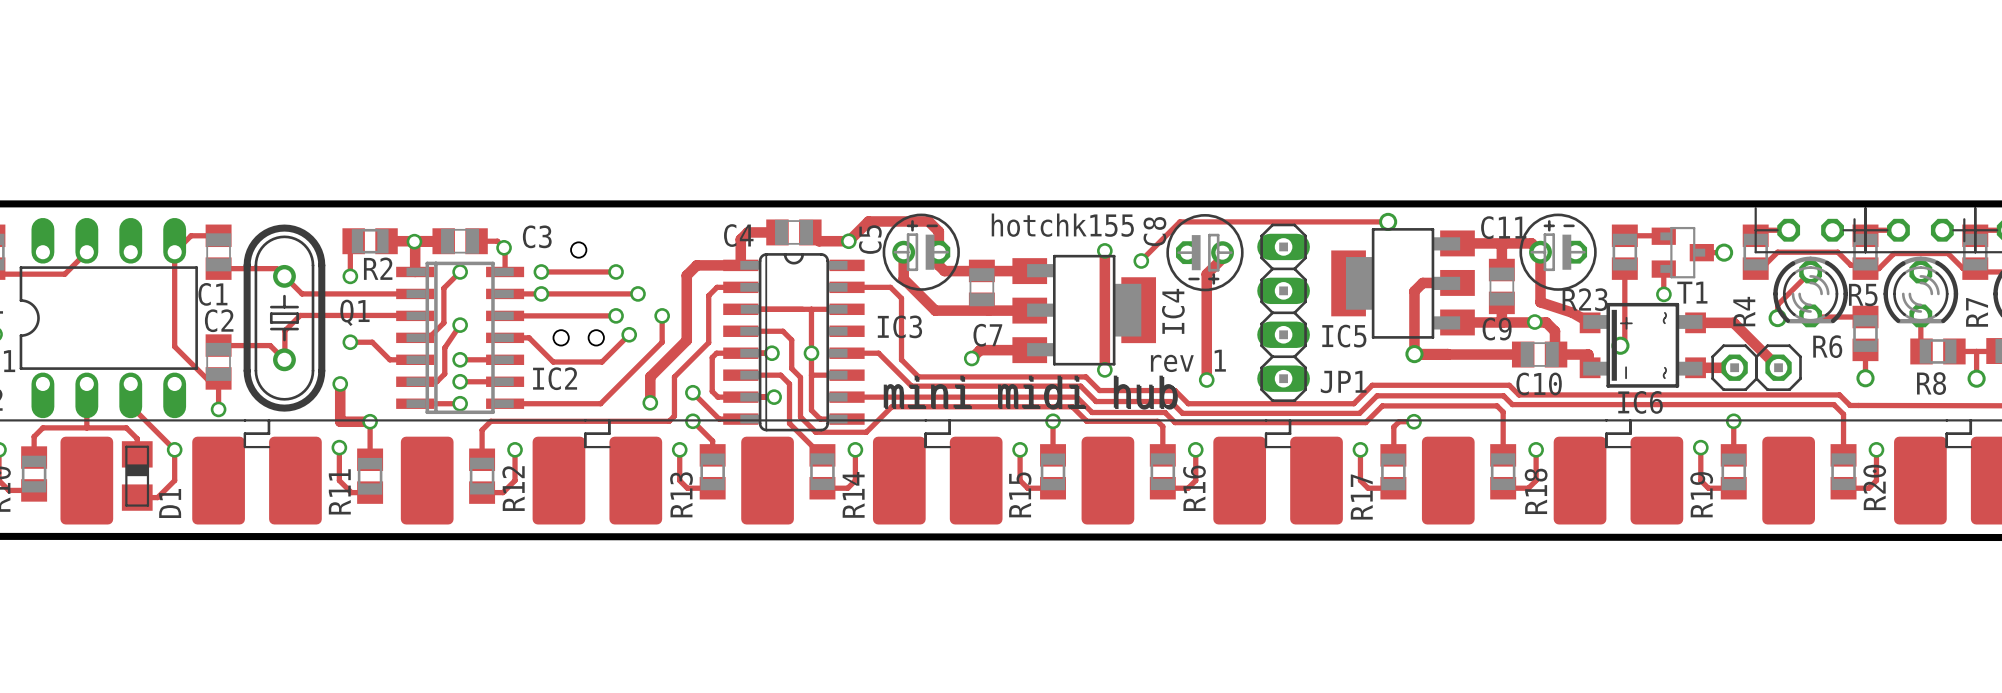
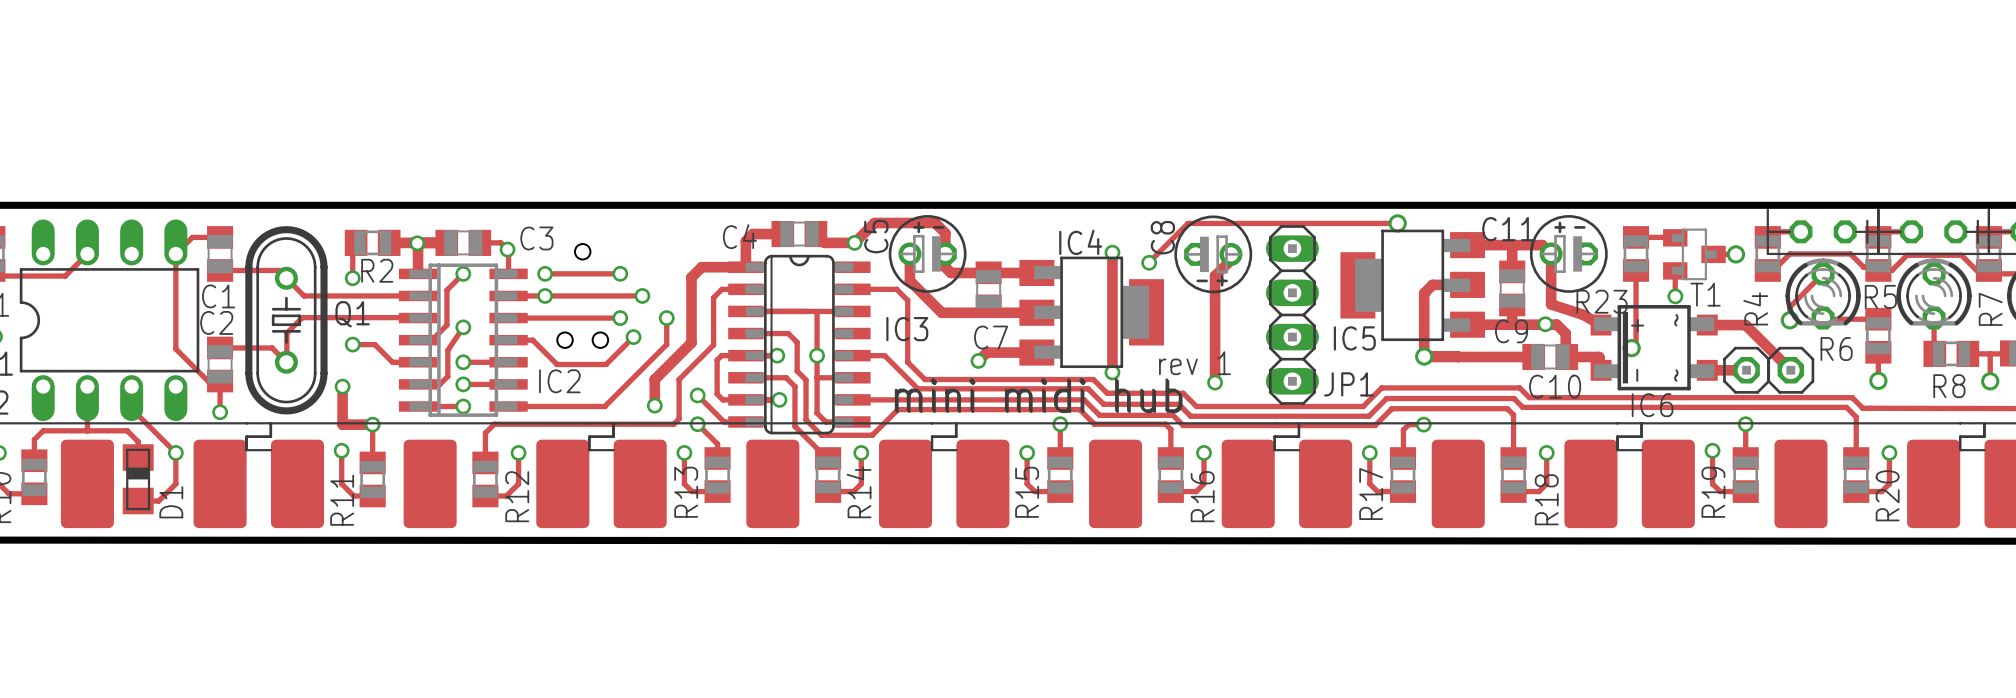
text: hotchk155 (1062, 225) -> none
IC4 name rotation: 0° (1173, 311) -> 90° clockwise (1080, 242)
IC4 name position: IC4 (1173, 311) -> IC4 (1080, 242)

